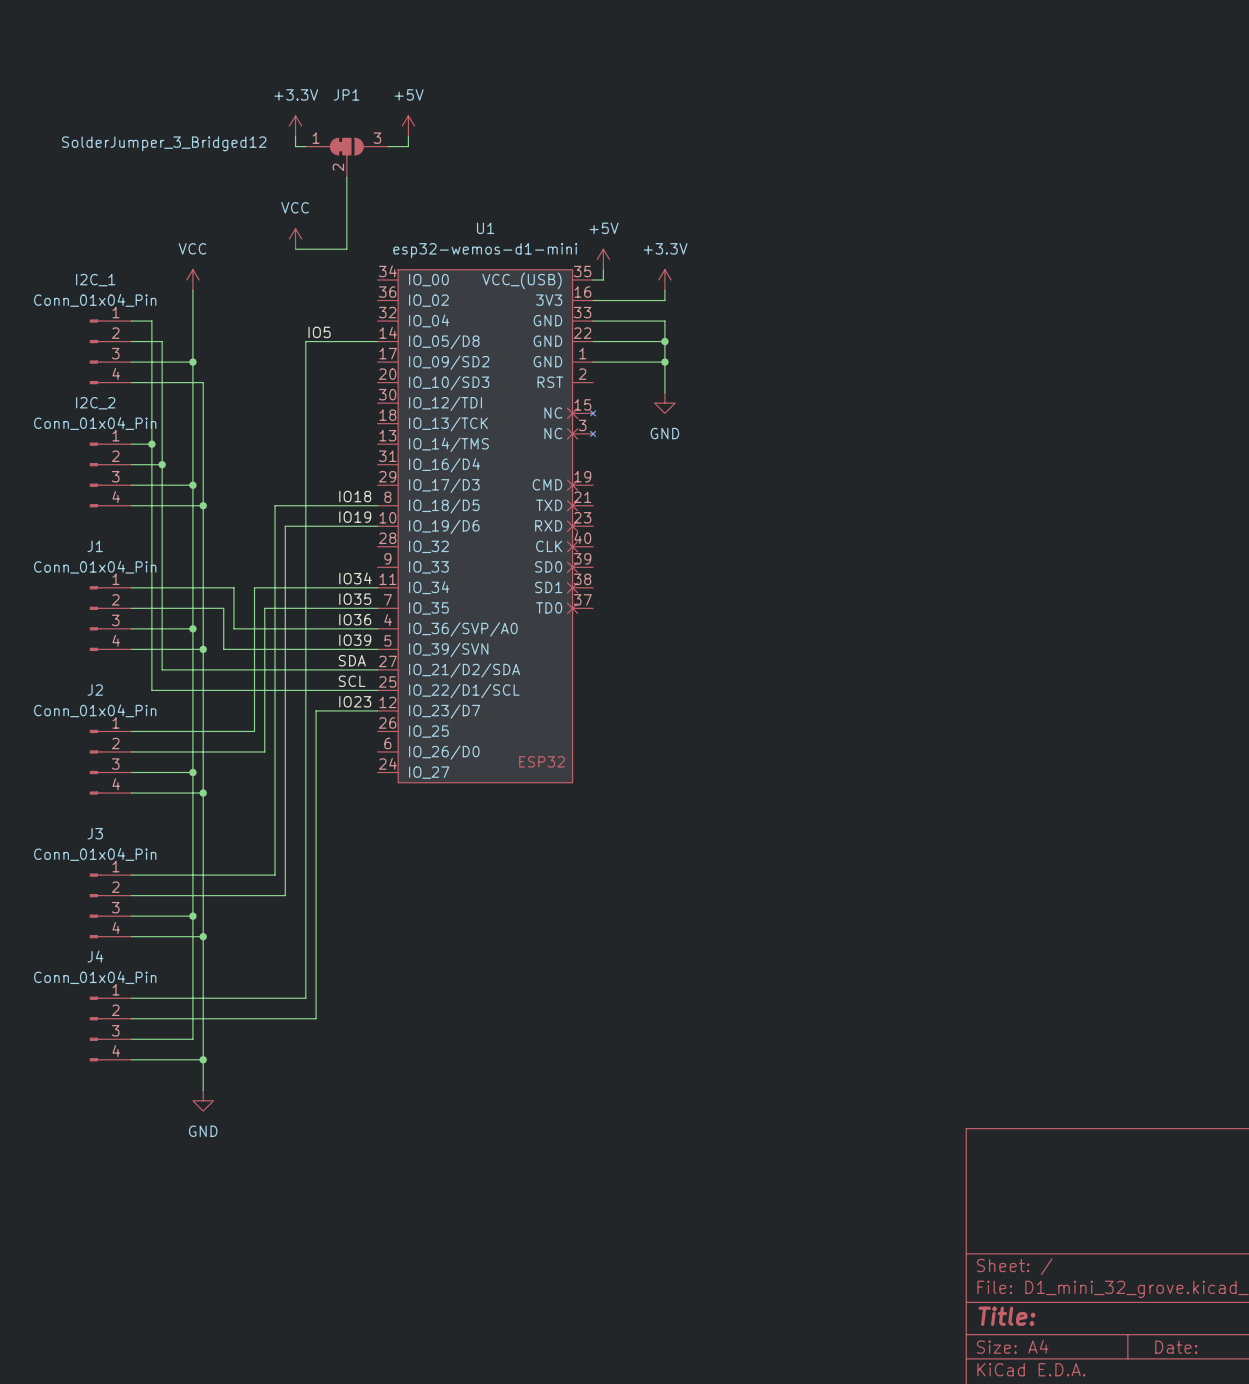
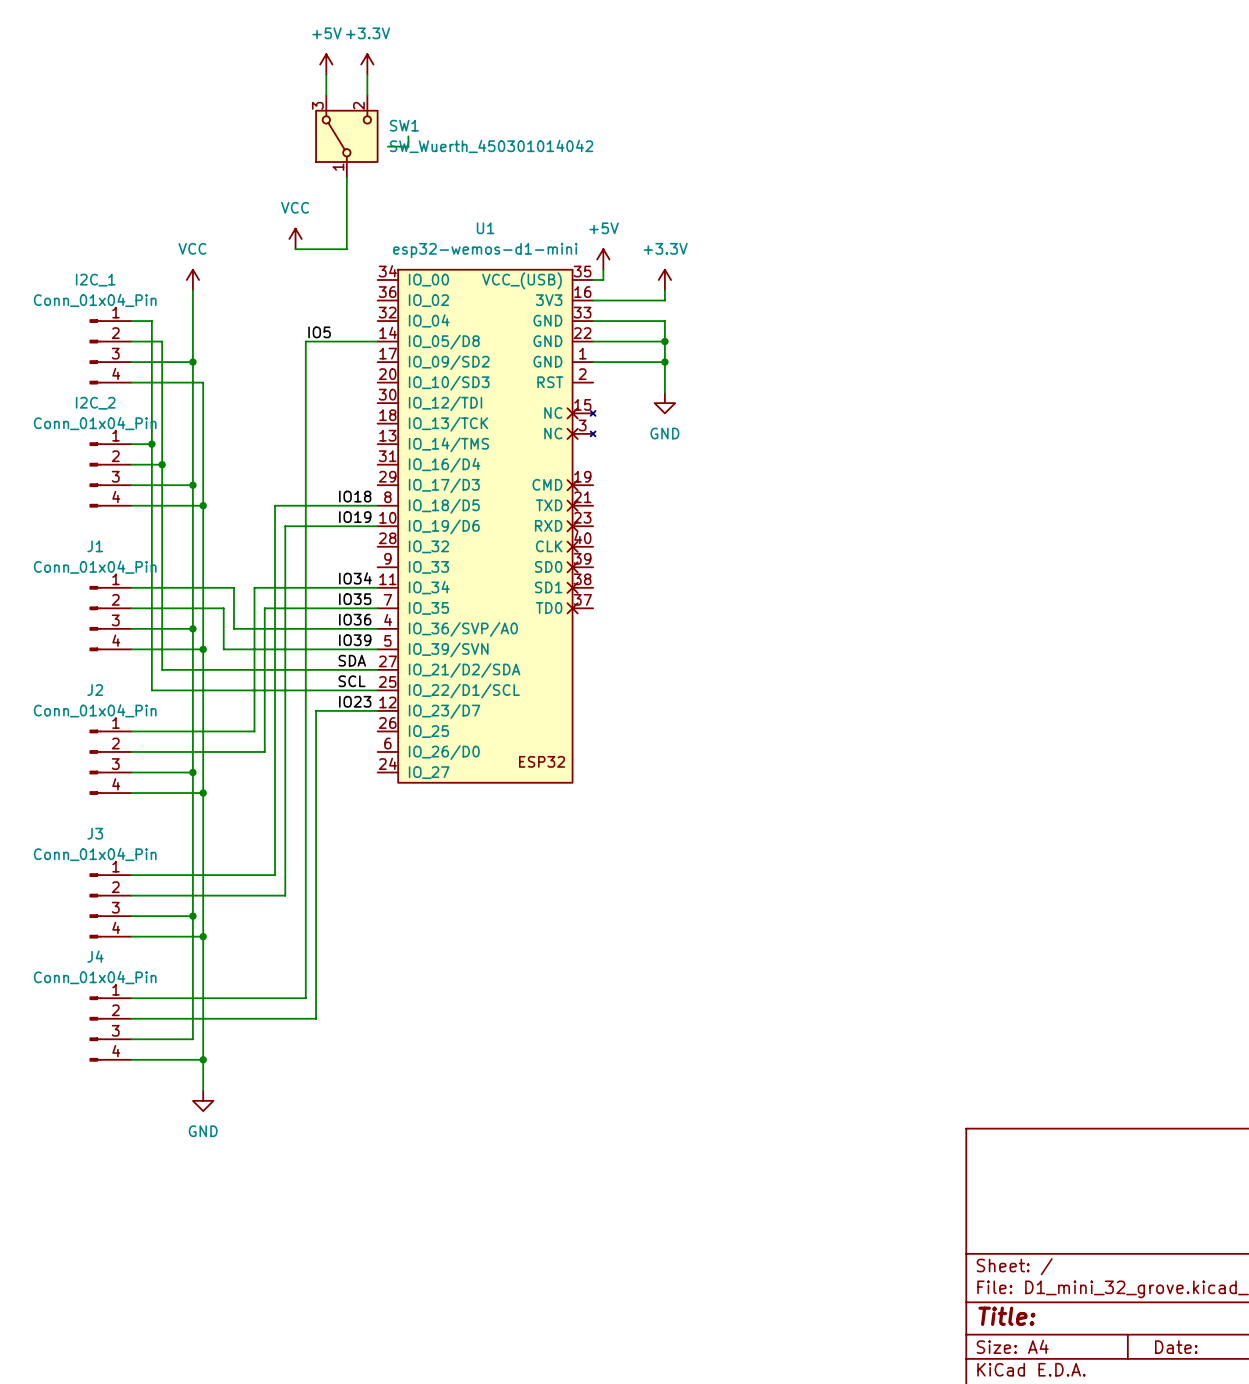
wire: none -> (326, 74) (326, 95)
wire: none -> (367, 74) (367, 95)
power symbol position: +3.3V (295, 126) -> +3.3V (367, 64)
power symbol position: +5V (408, 126) -> +5V (326, 64)
wire: (295, 136) (295, 146) (305, 146) -> none
SW1: none -> SW_Wuerth_450301014042 (346, 136)
JP1: SolderJumper_3_Bridged12 (346, 157) -> none

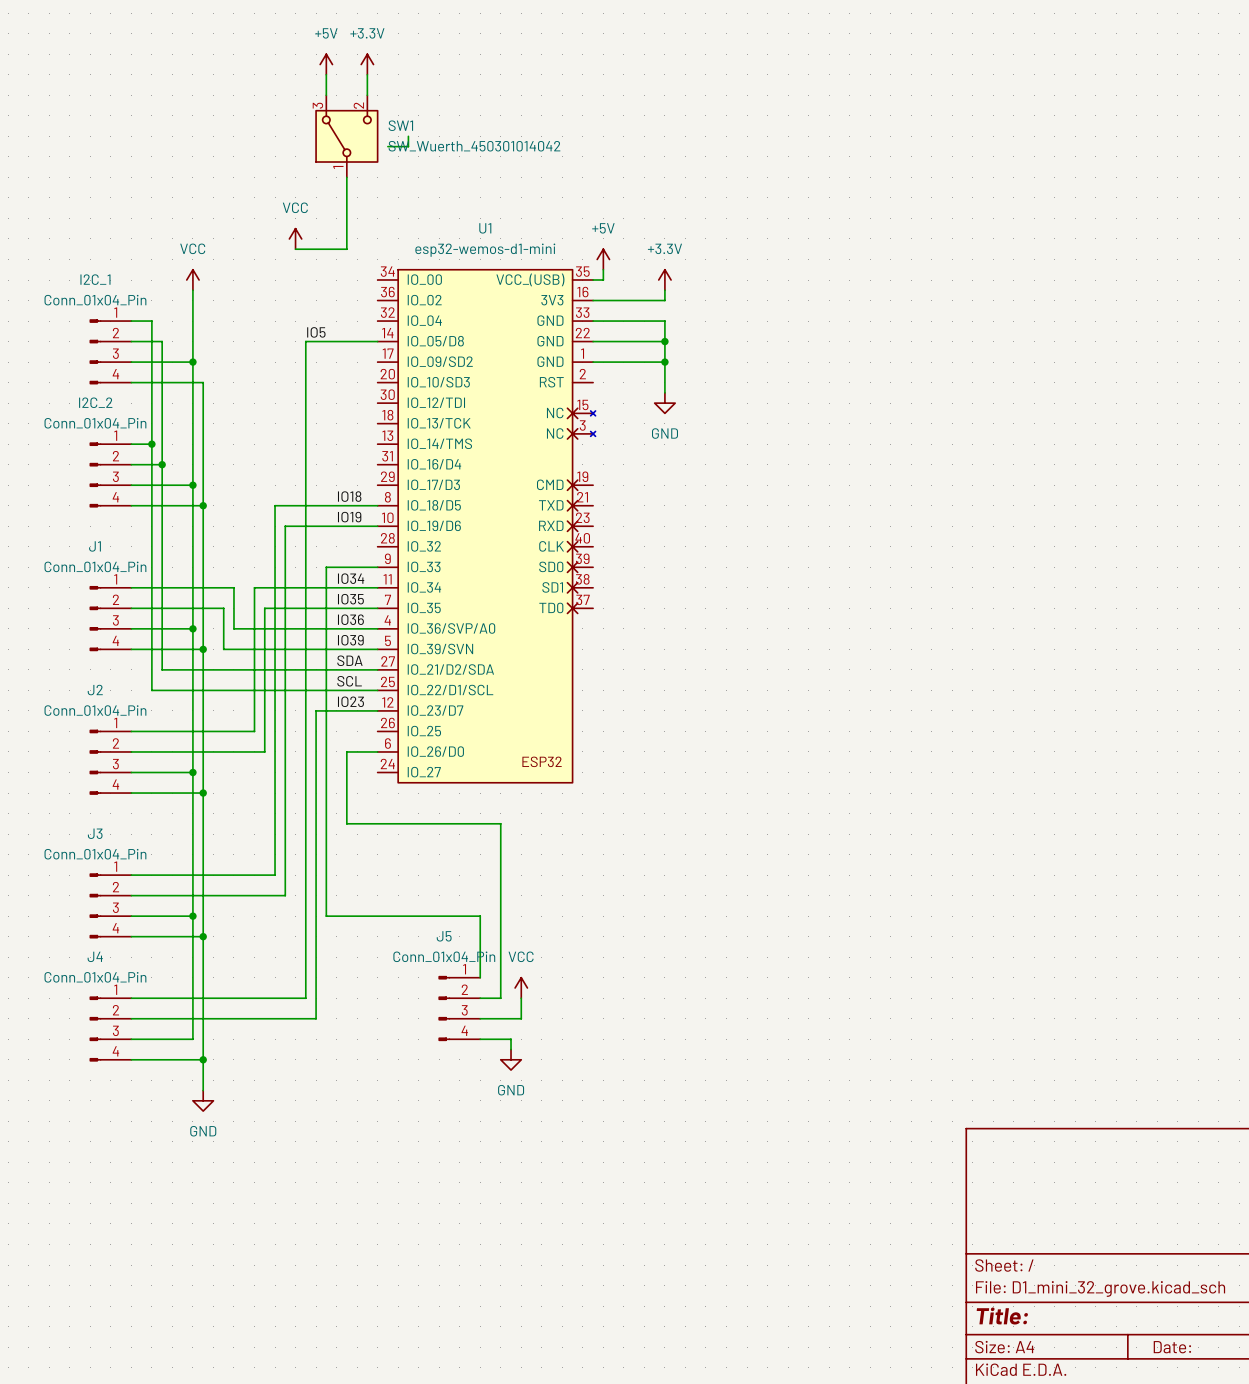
wire: none -> (377, 567) (326, 567) (326, 916) (480, 916) (480, 977)
wire: none -> (377, 751) (346, 751) (346, 823) (500, 823) (500, 998) (480, 998)
power symbol: none -> VCC (521, 987)
wire: none -> (521, 998) (521, 1018) (480, 1018)
J5: none -> Conn_01x04_Pin (459, 1008)
wire: none -> (480, 1039) (511, 1039) (511, 1049)
power symbol: none -> GND (511, 1059)

